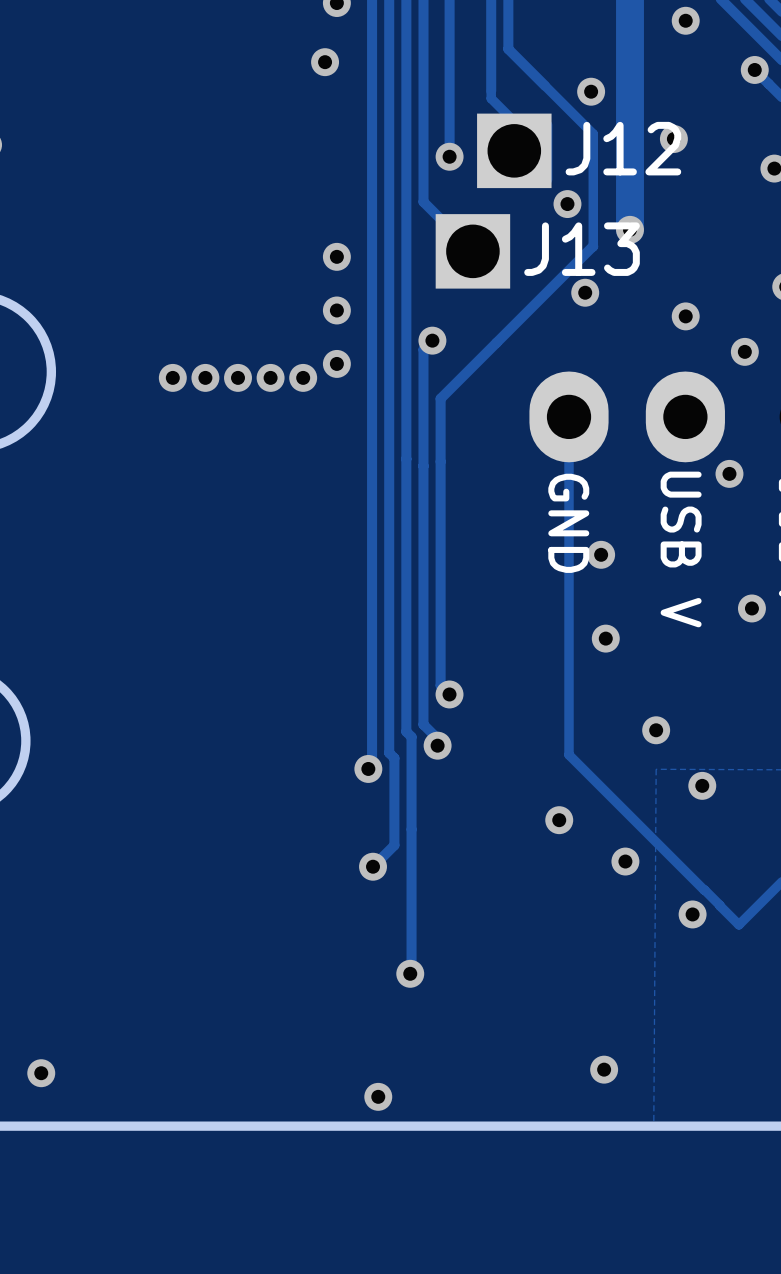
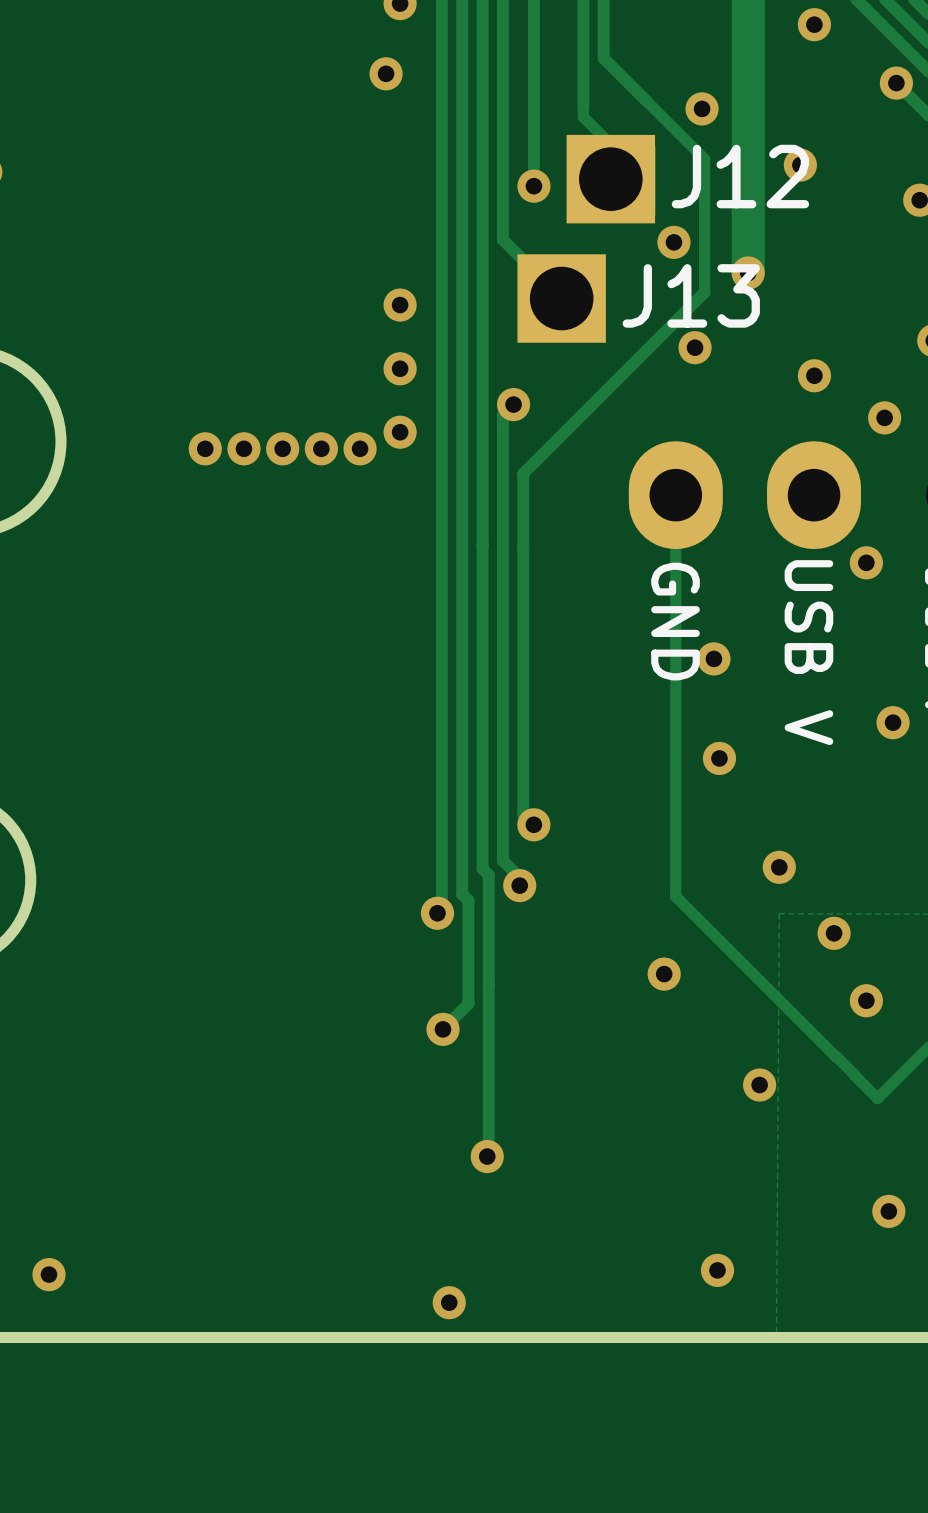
via: none -> (866, 1000)
via: (625, 861) -> none
via: none -> (759, 1085)
via: (692, 914) -> none
via: none -> (888, 1211)

